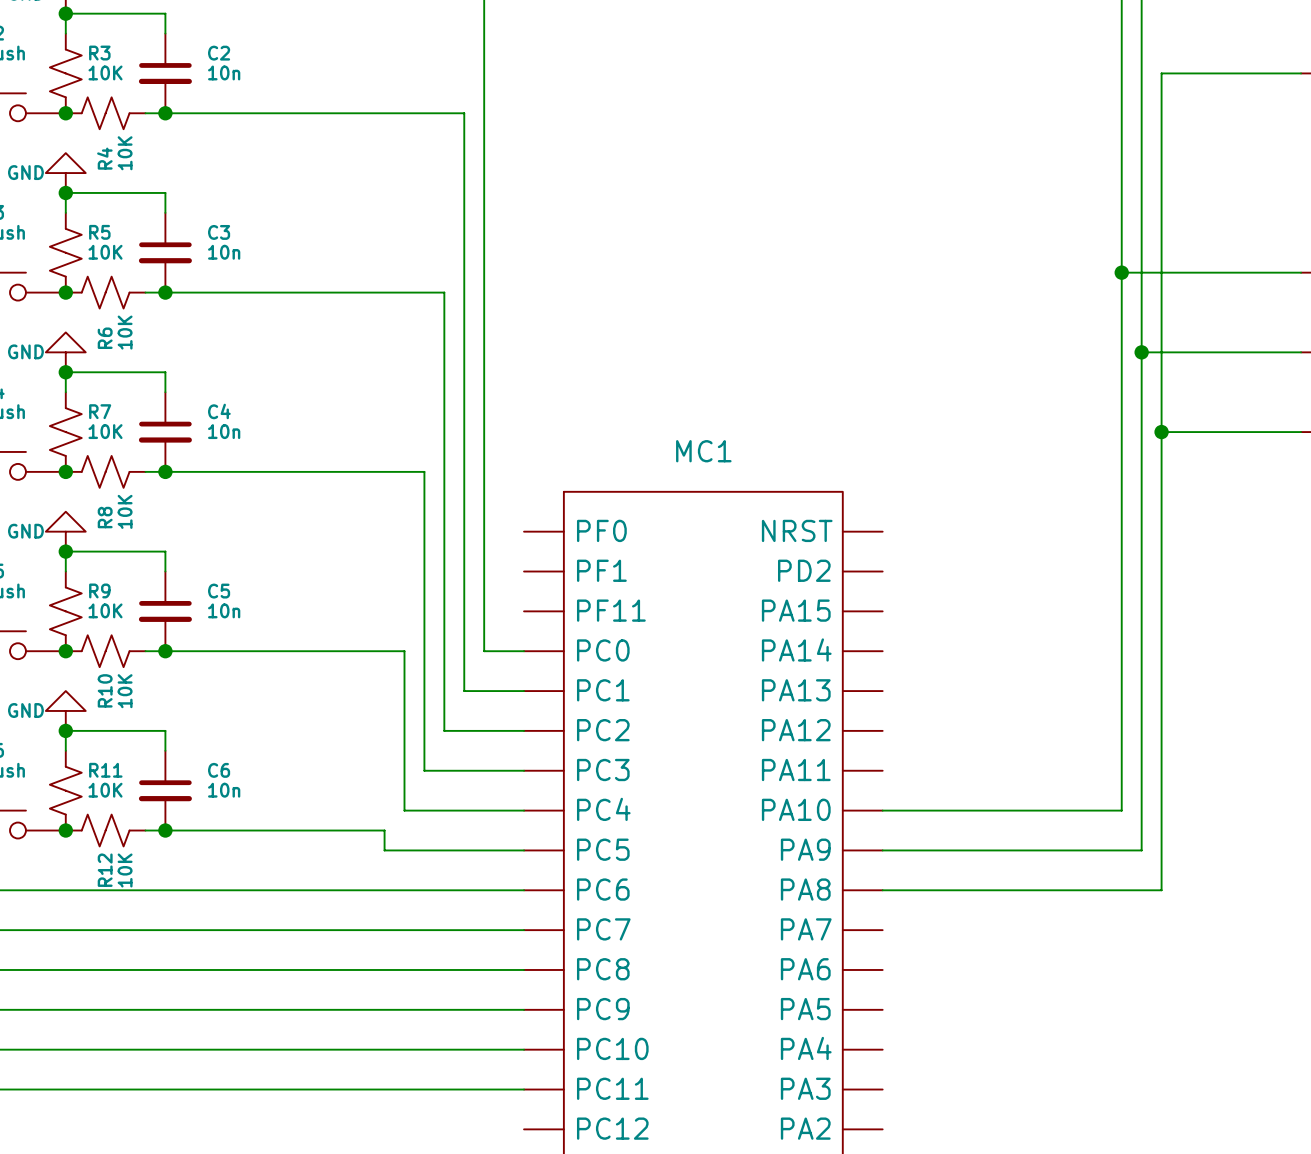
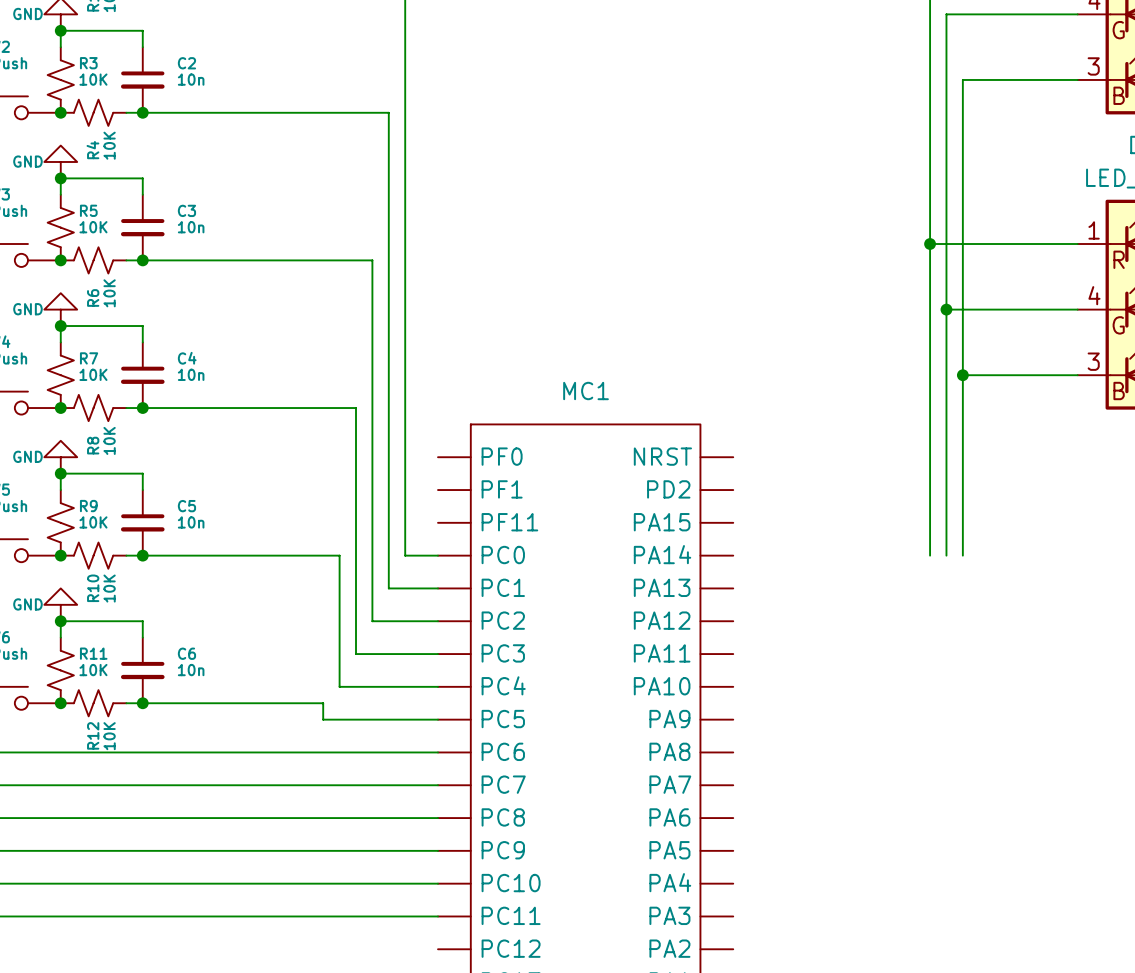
wire: (1121, 651) (1121, 810) (882, 810) -> none
wire: (1141, 651) (1141, 850) (882, 850) -> none
wire: (1161, 651) (1161, 890) (882, 890) -> none

